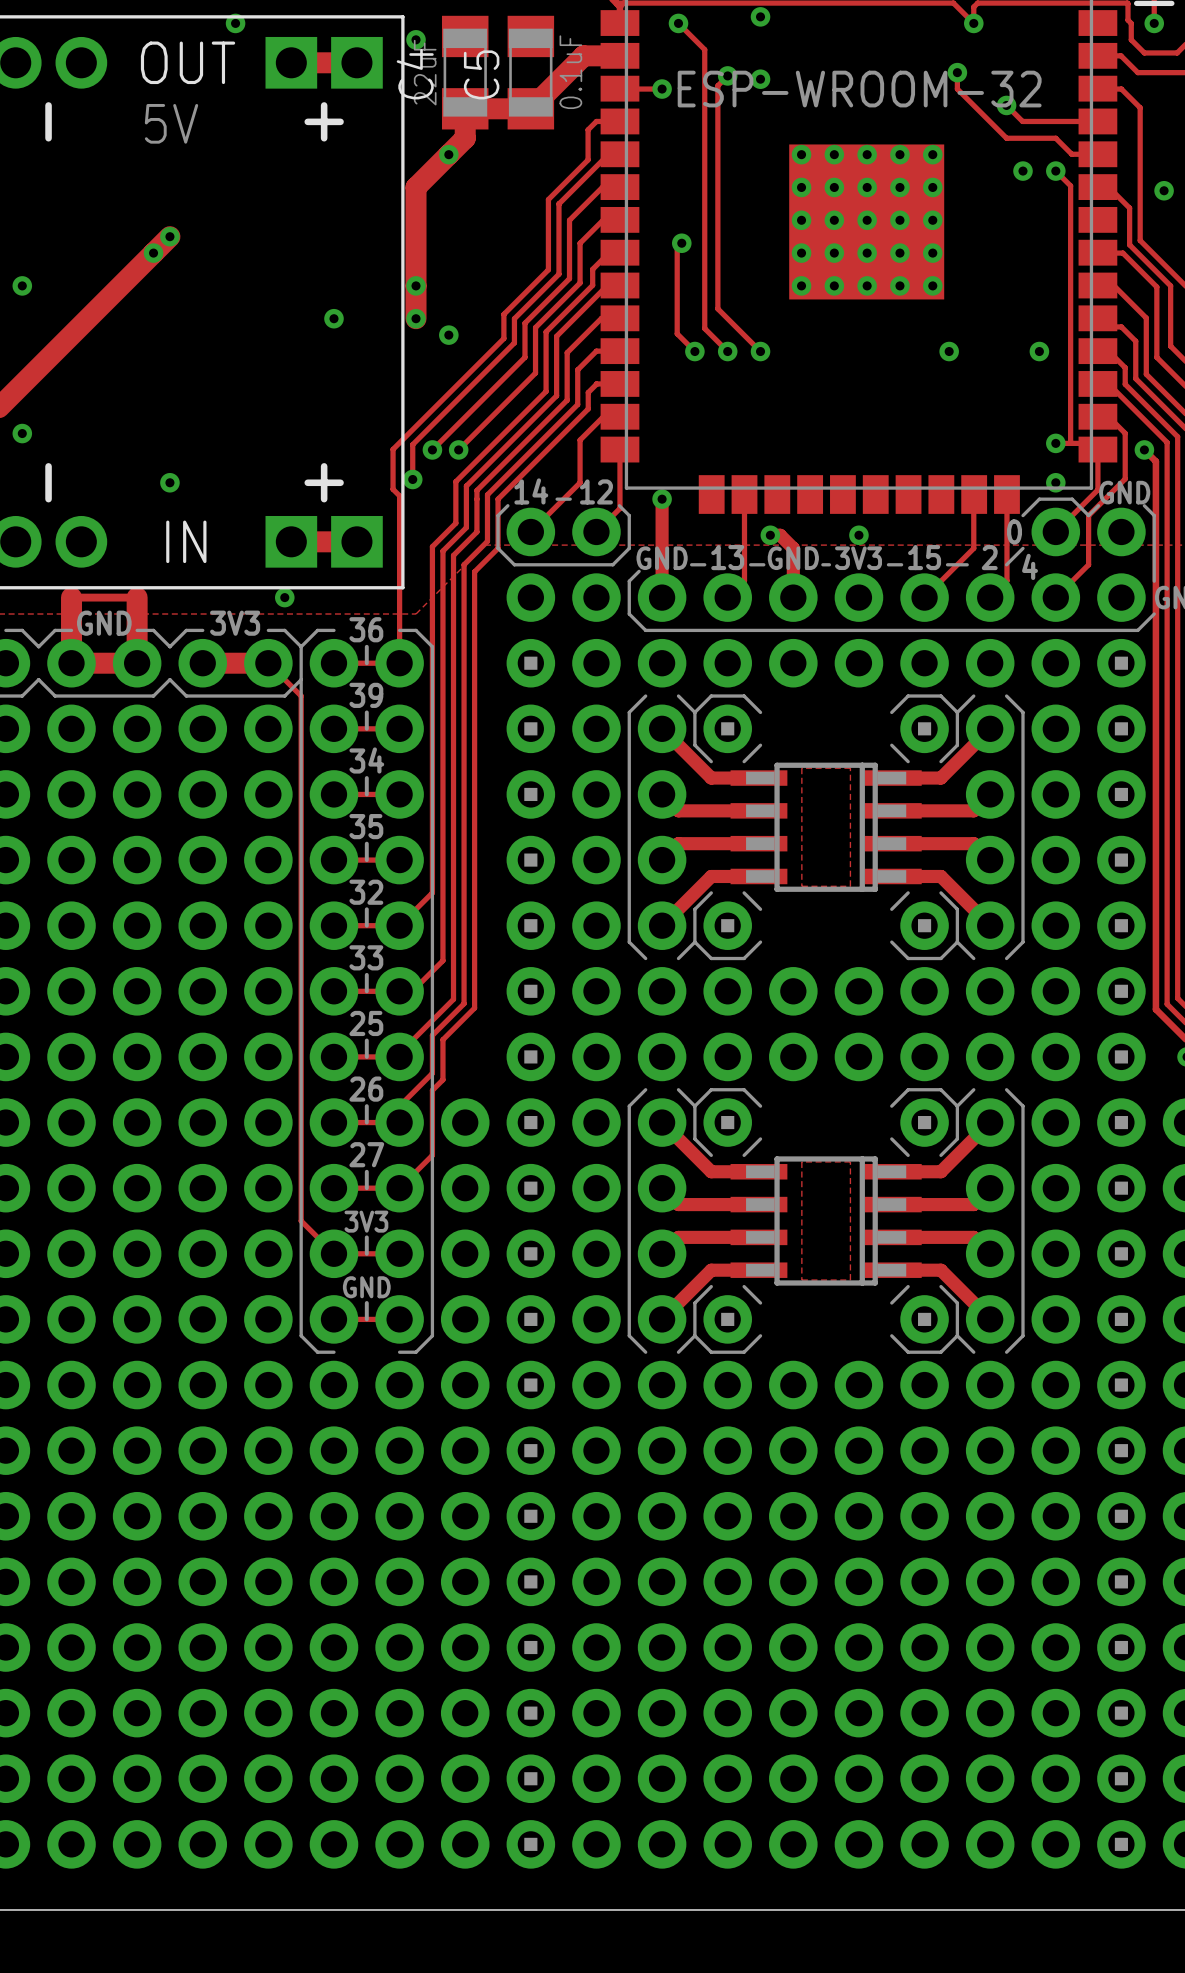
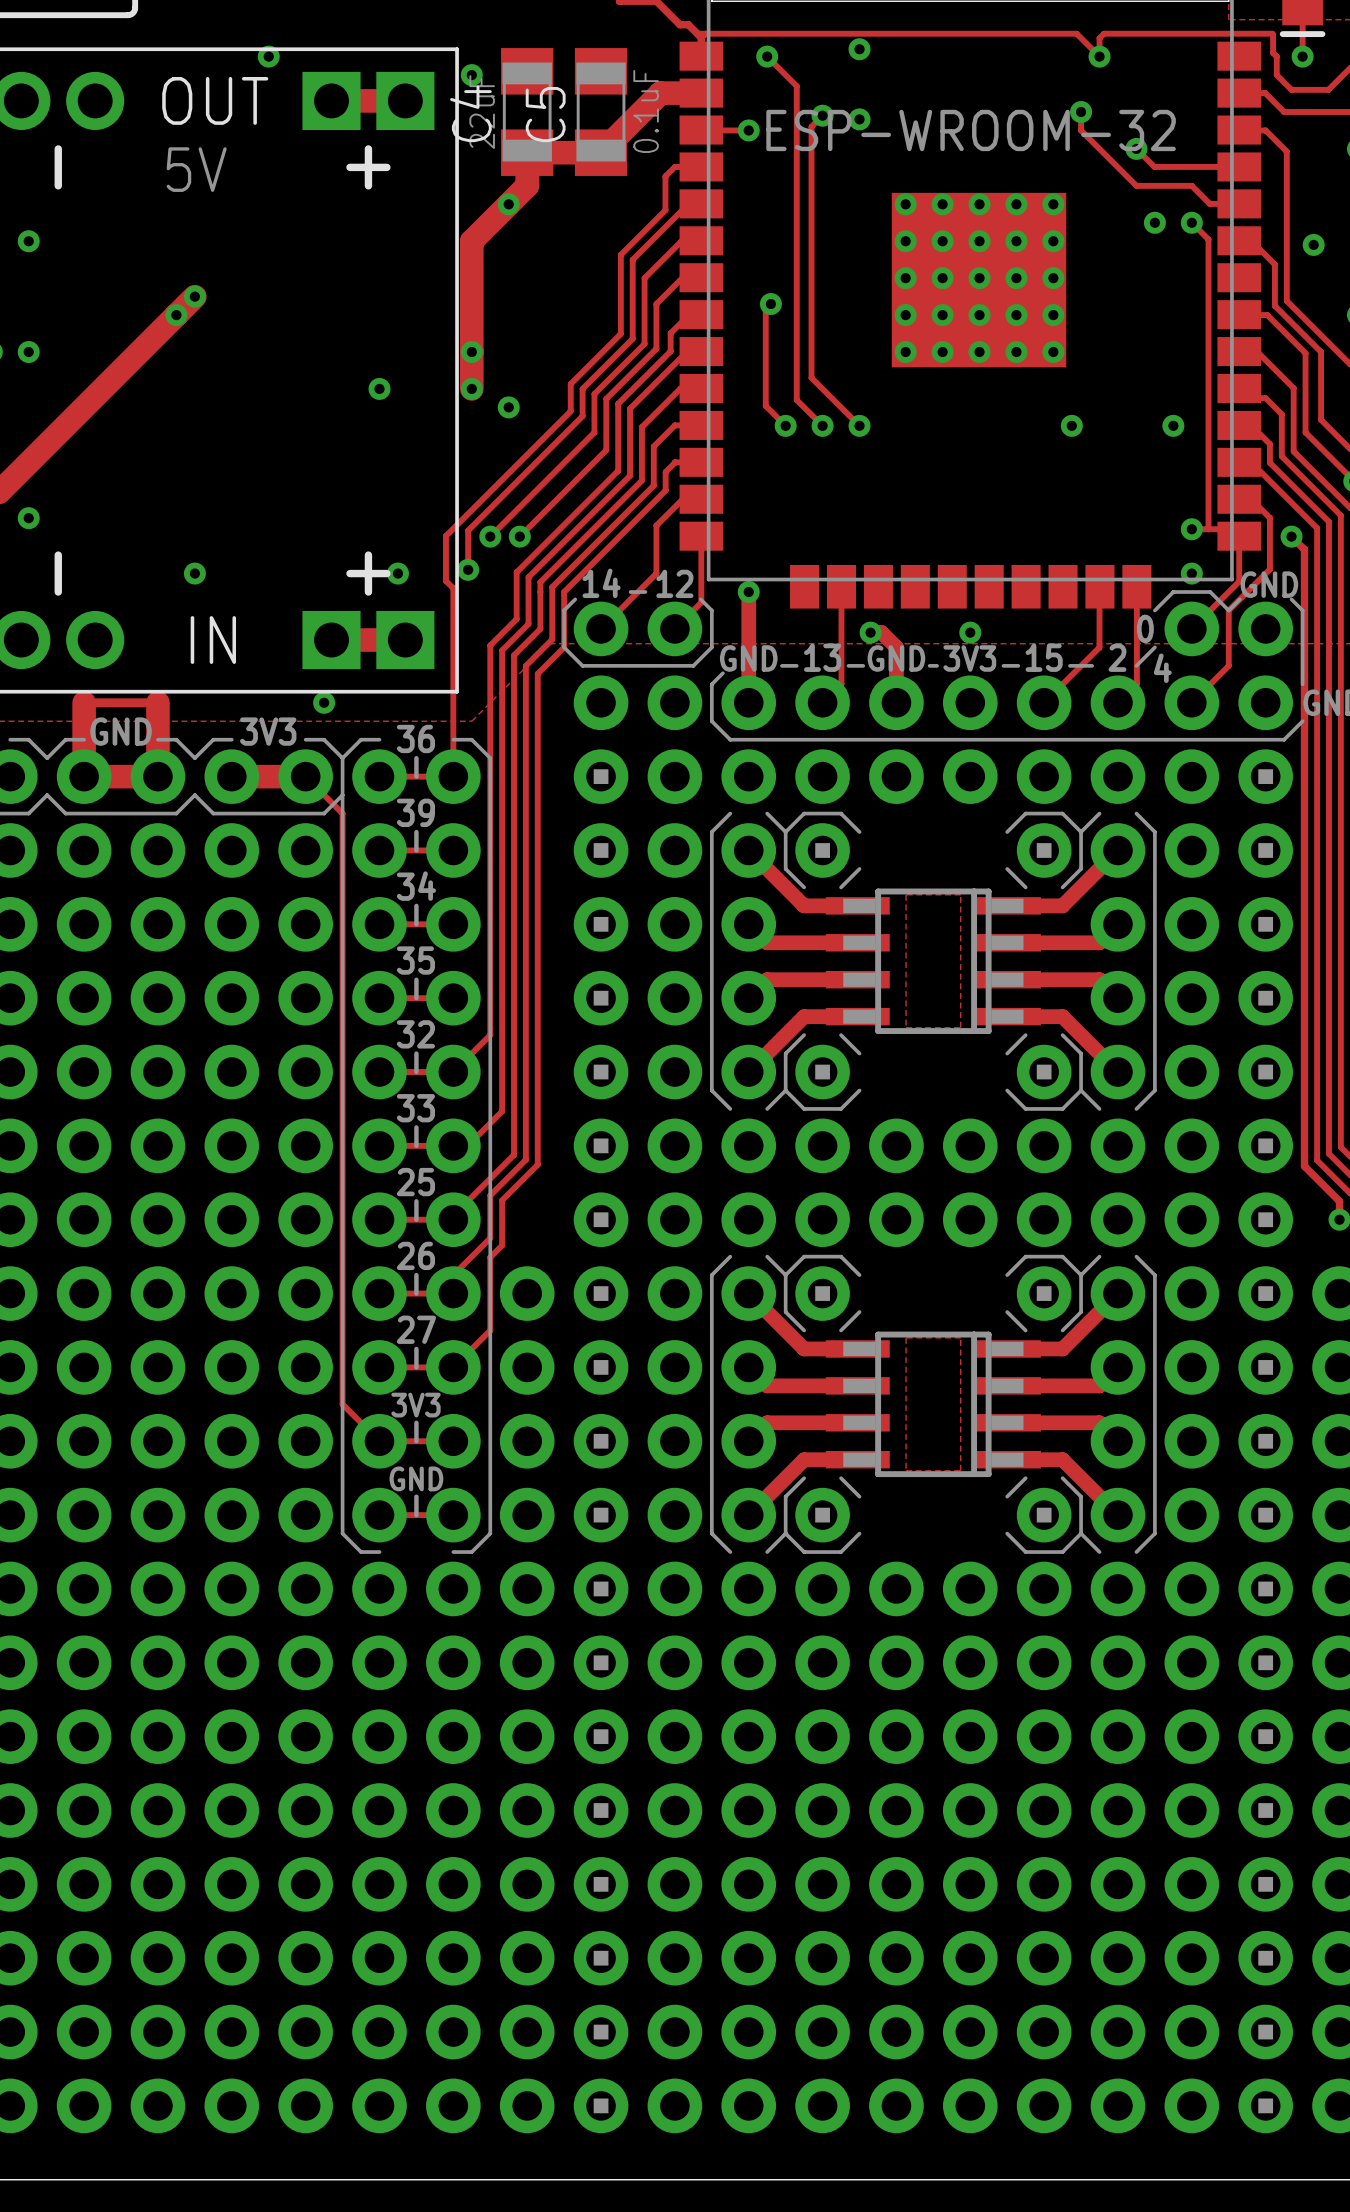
via: none -> (28, 241)
via: none -> (397, 573)

